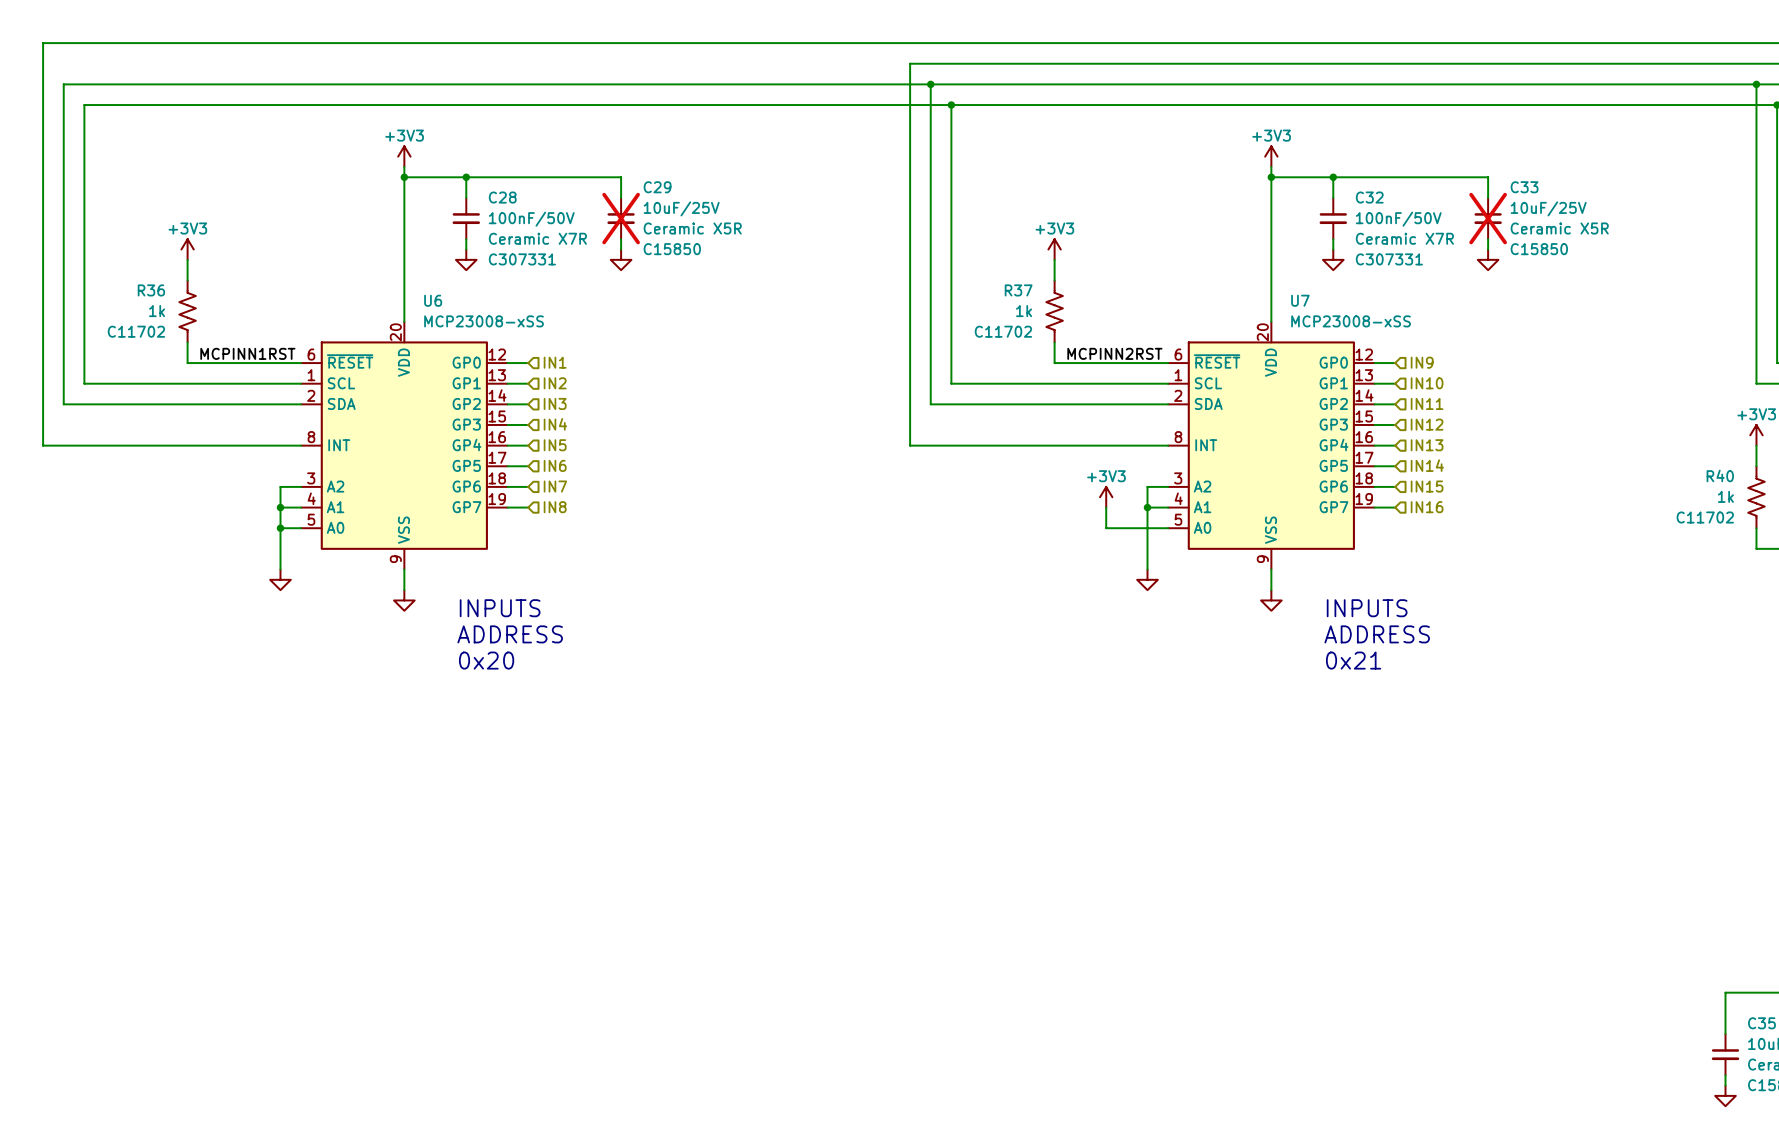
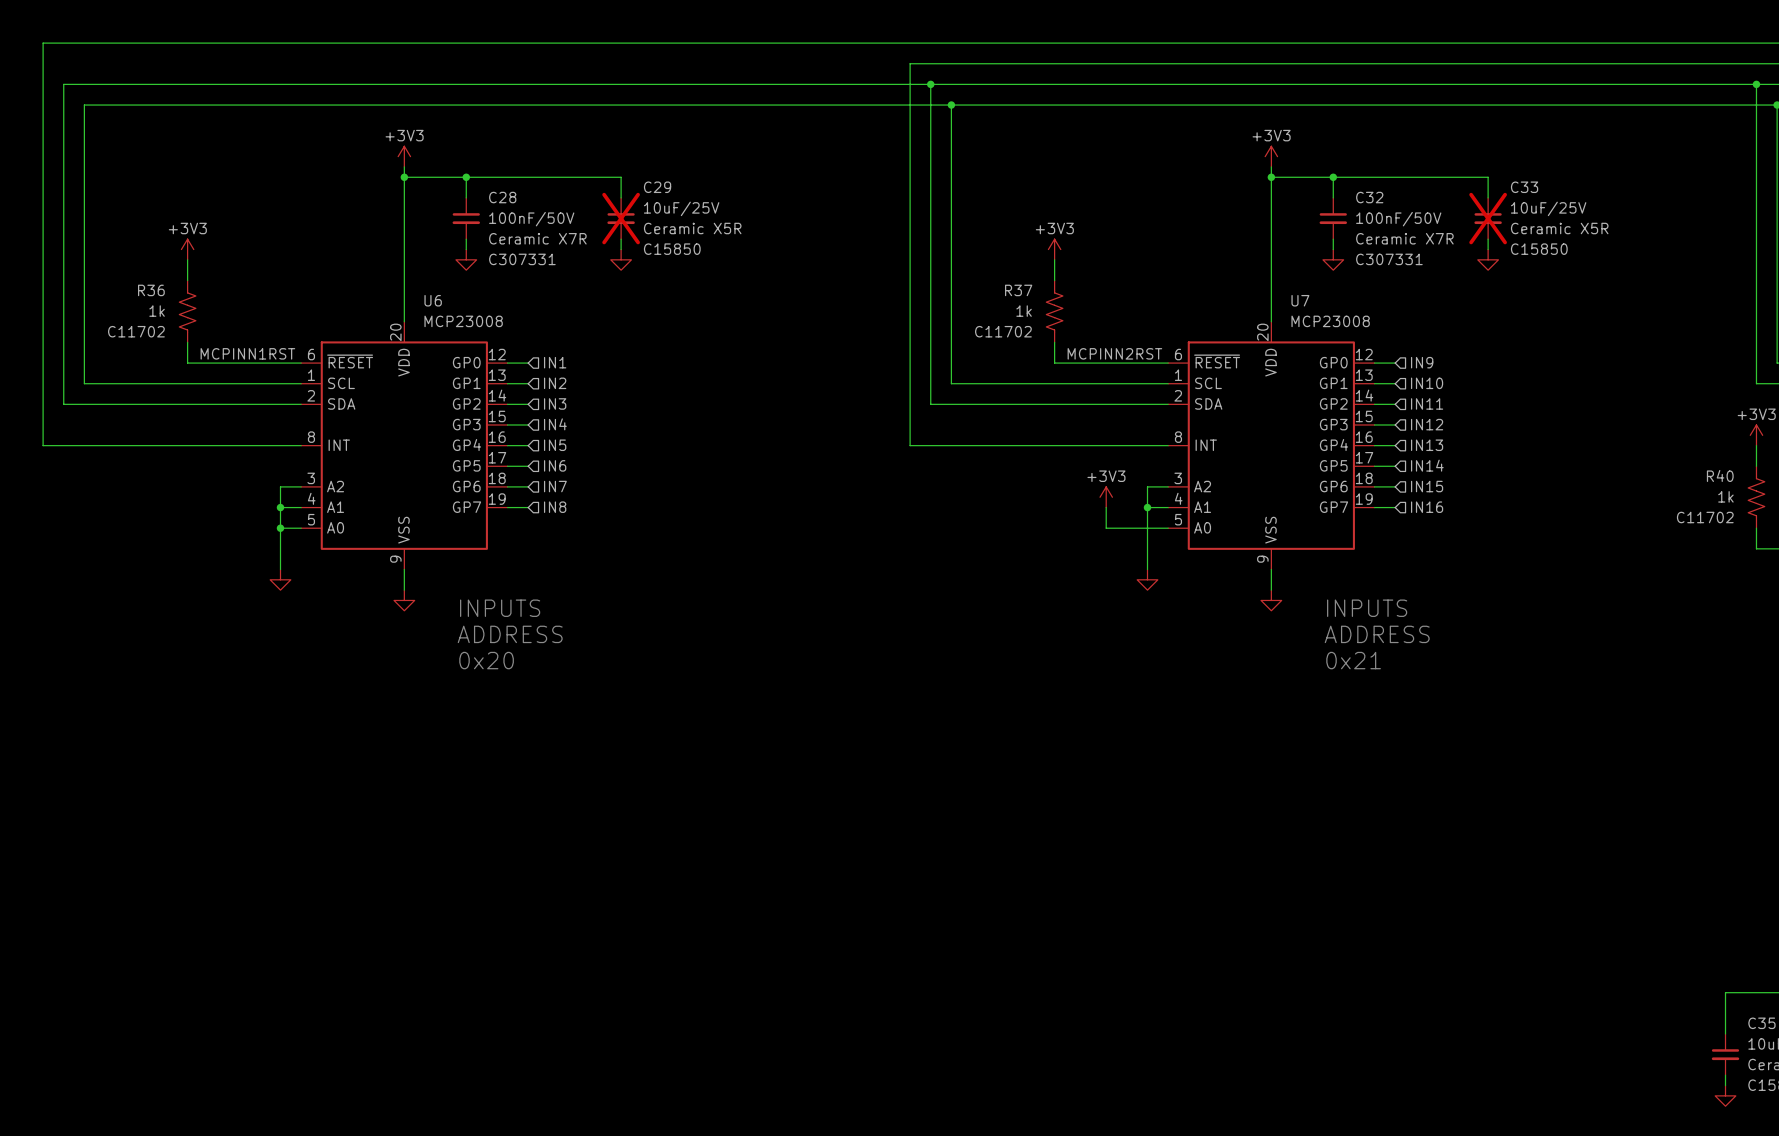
U6 value: MCP23008-xSS (484, 321) -> MCP23008 (463, 321)
U7 value: MCP23008-xSS (1351, 321) -> MCP23008 (1330, 321)

